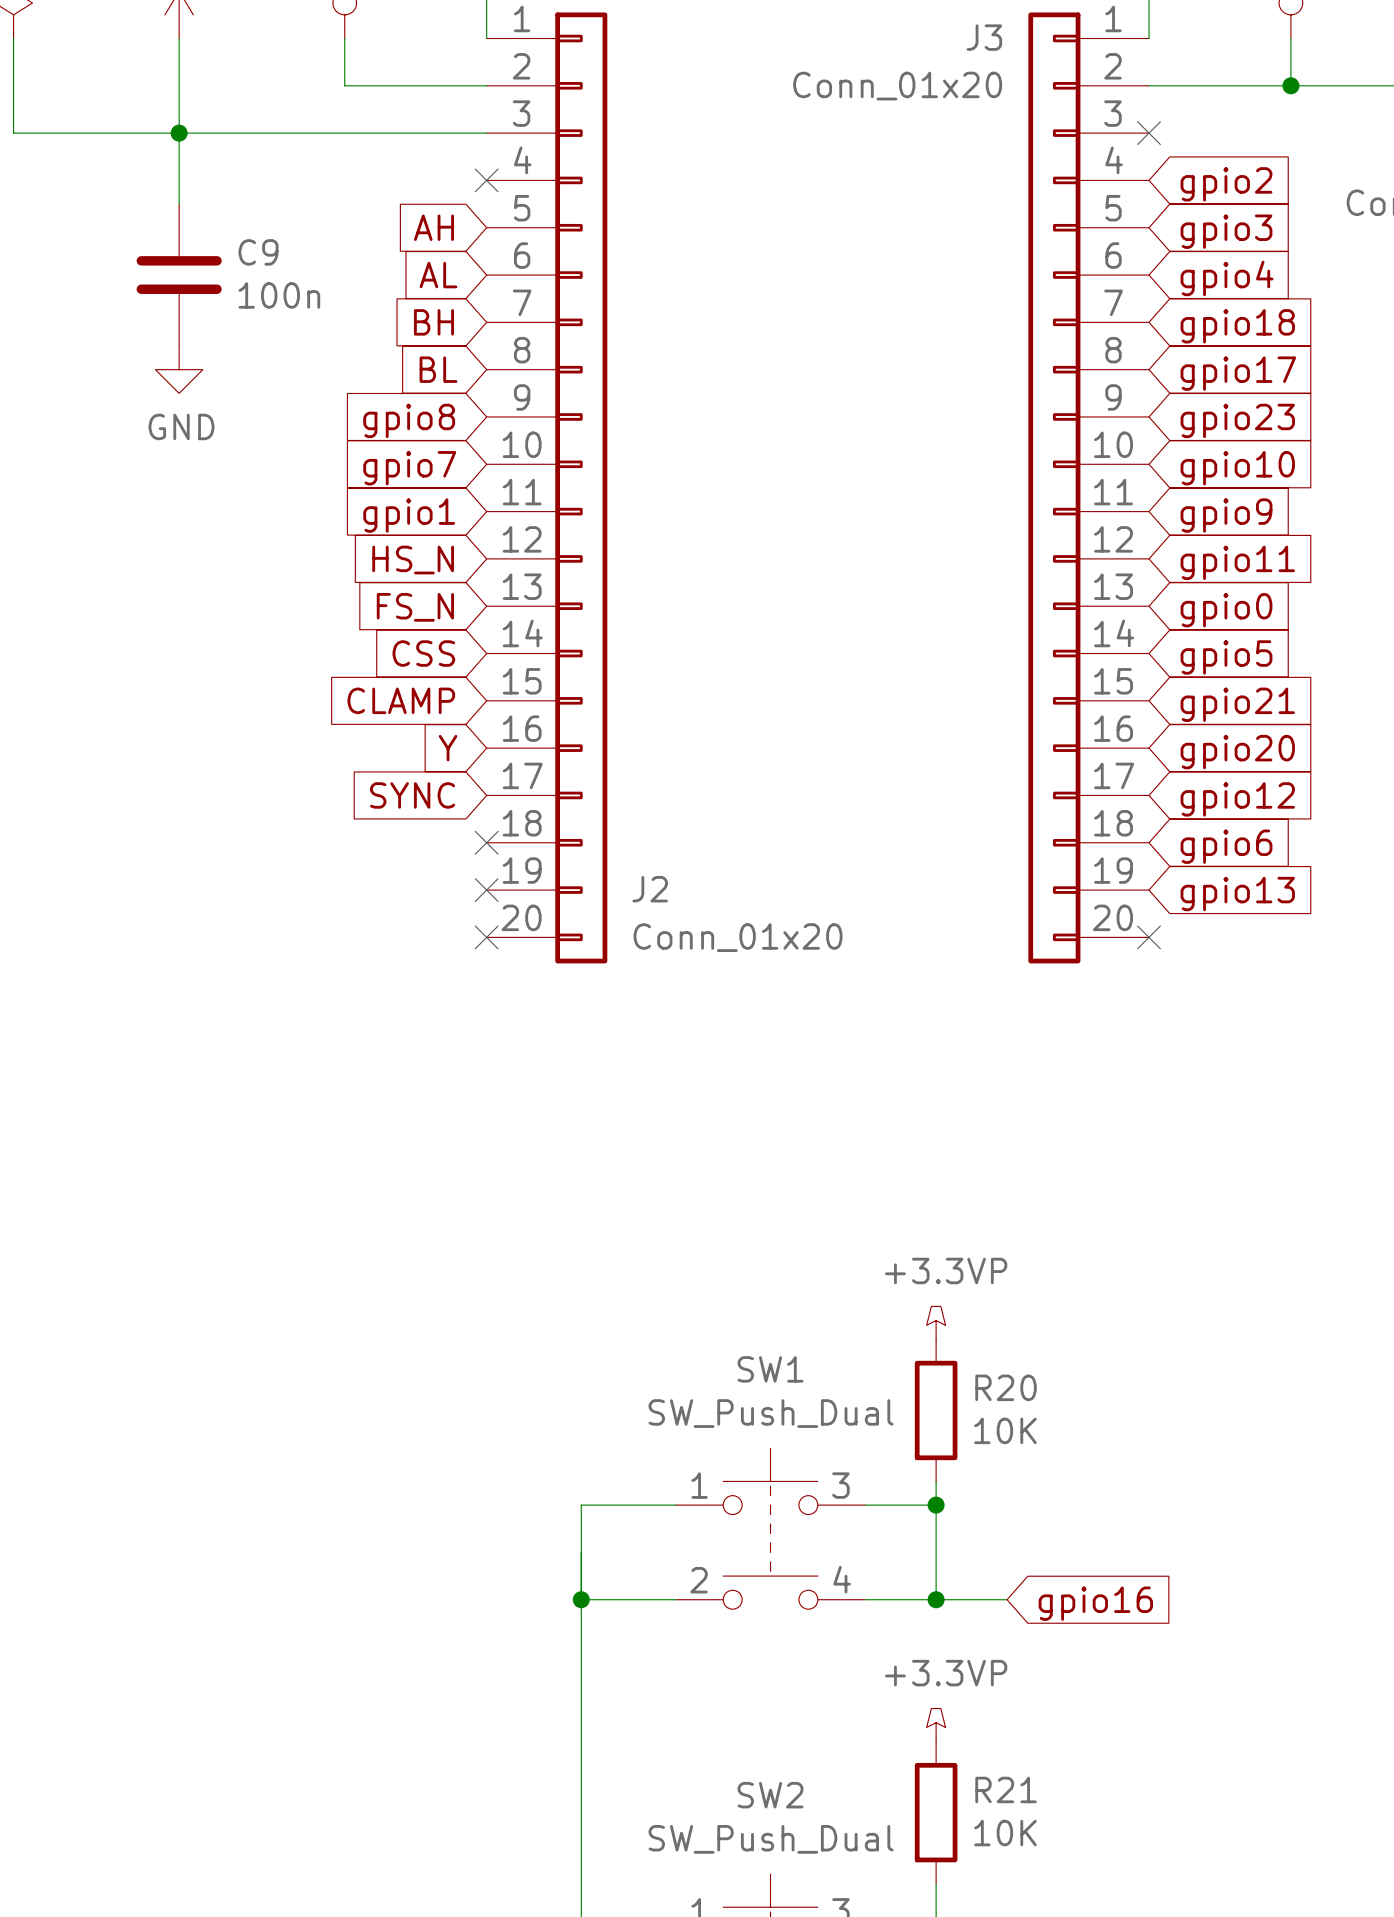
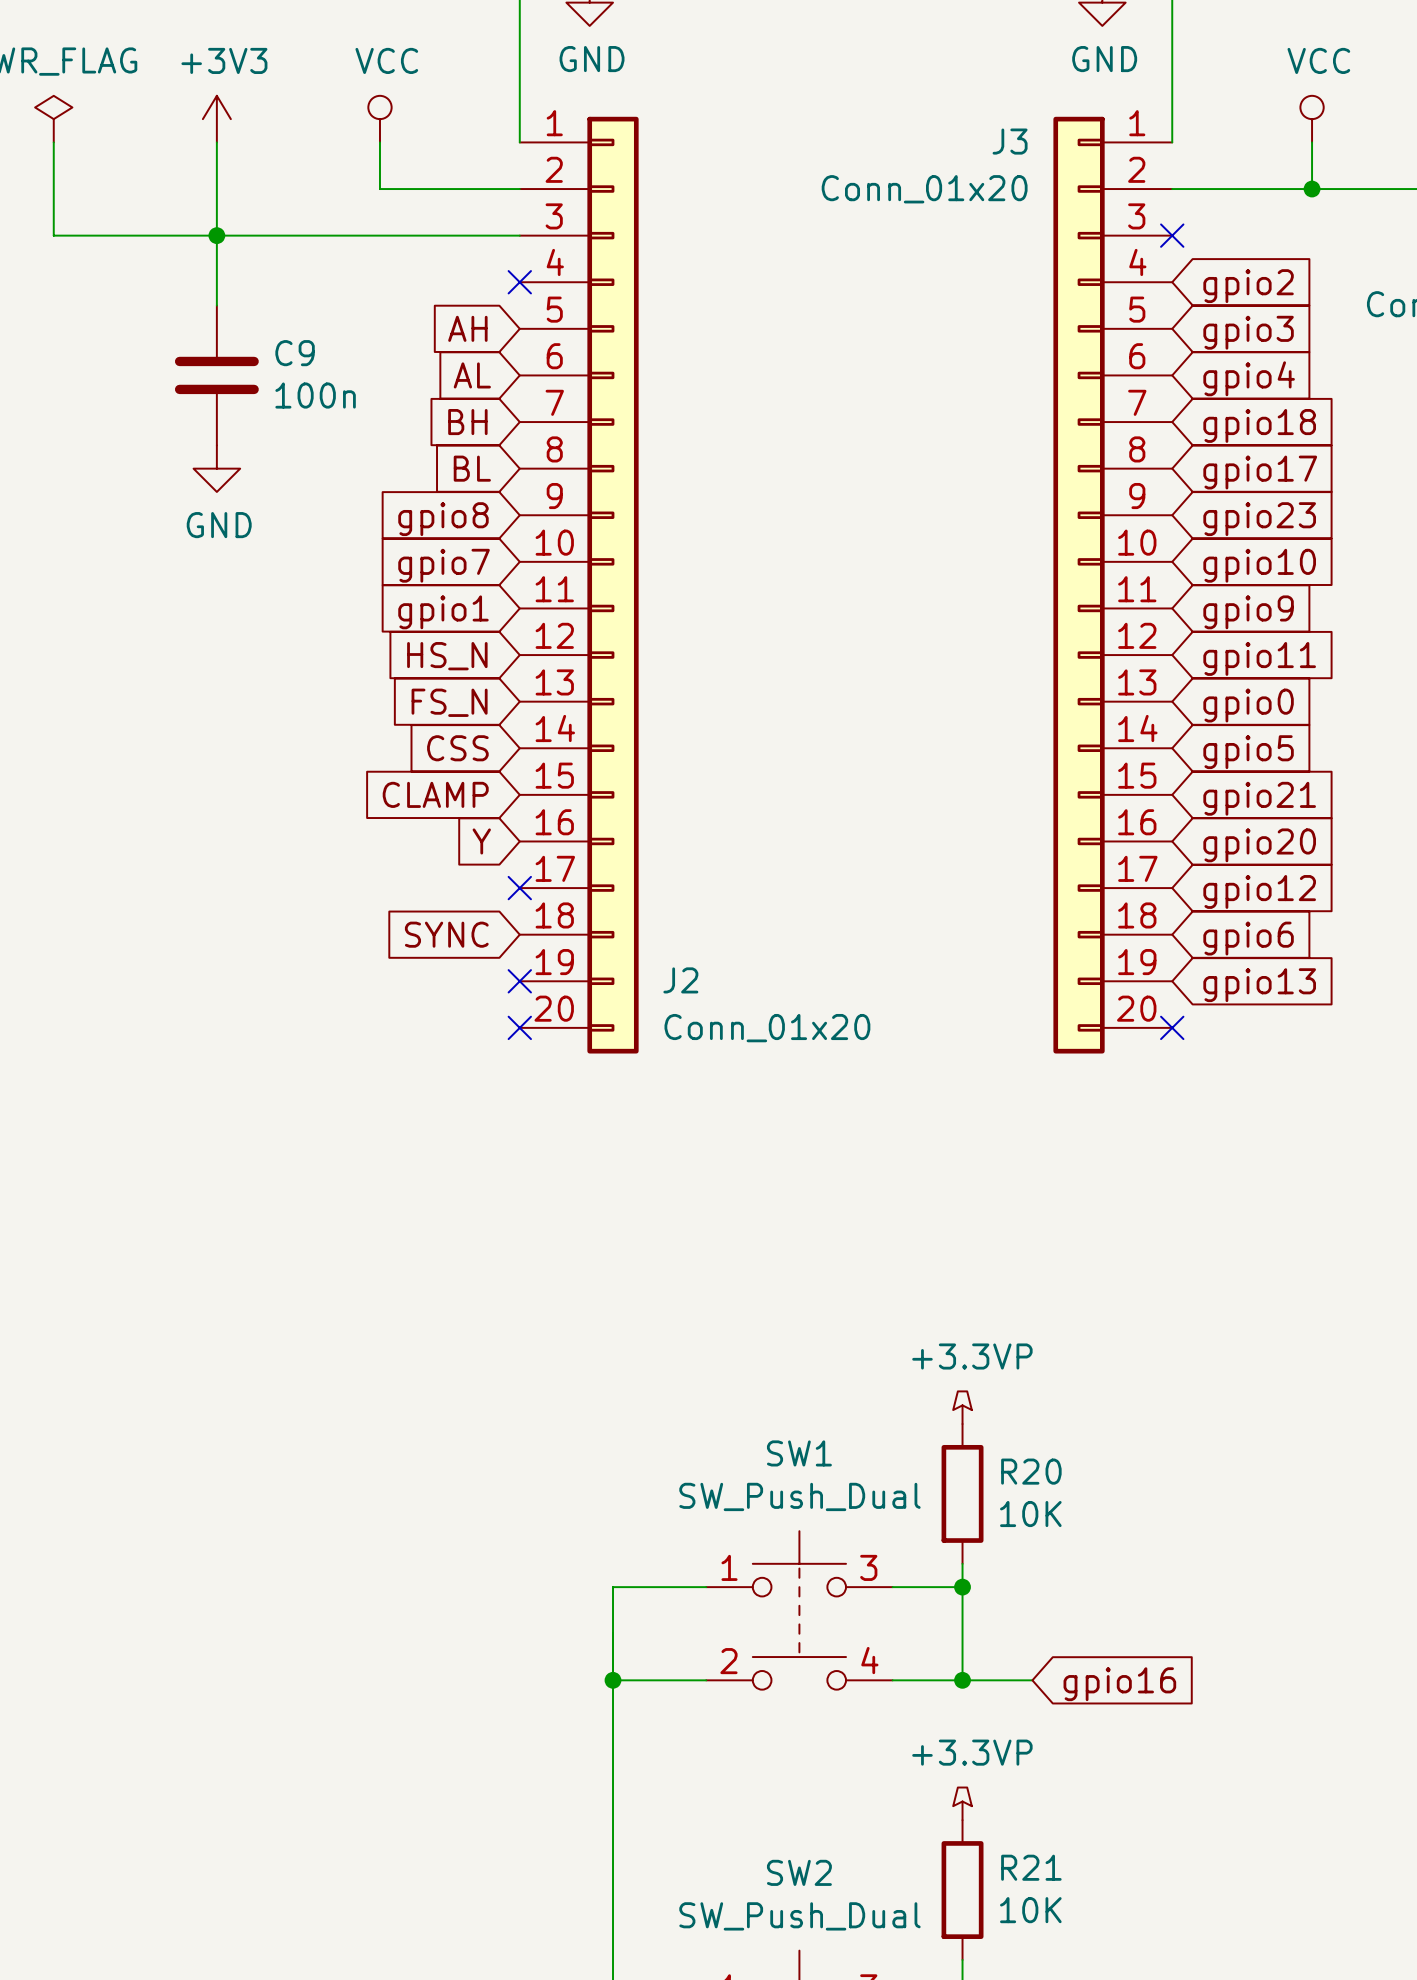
global label position: SYNC (412, 795) -> SYNC (446, 934)
no-connect mark position: (486, 842) -> (519, 888)

